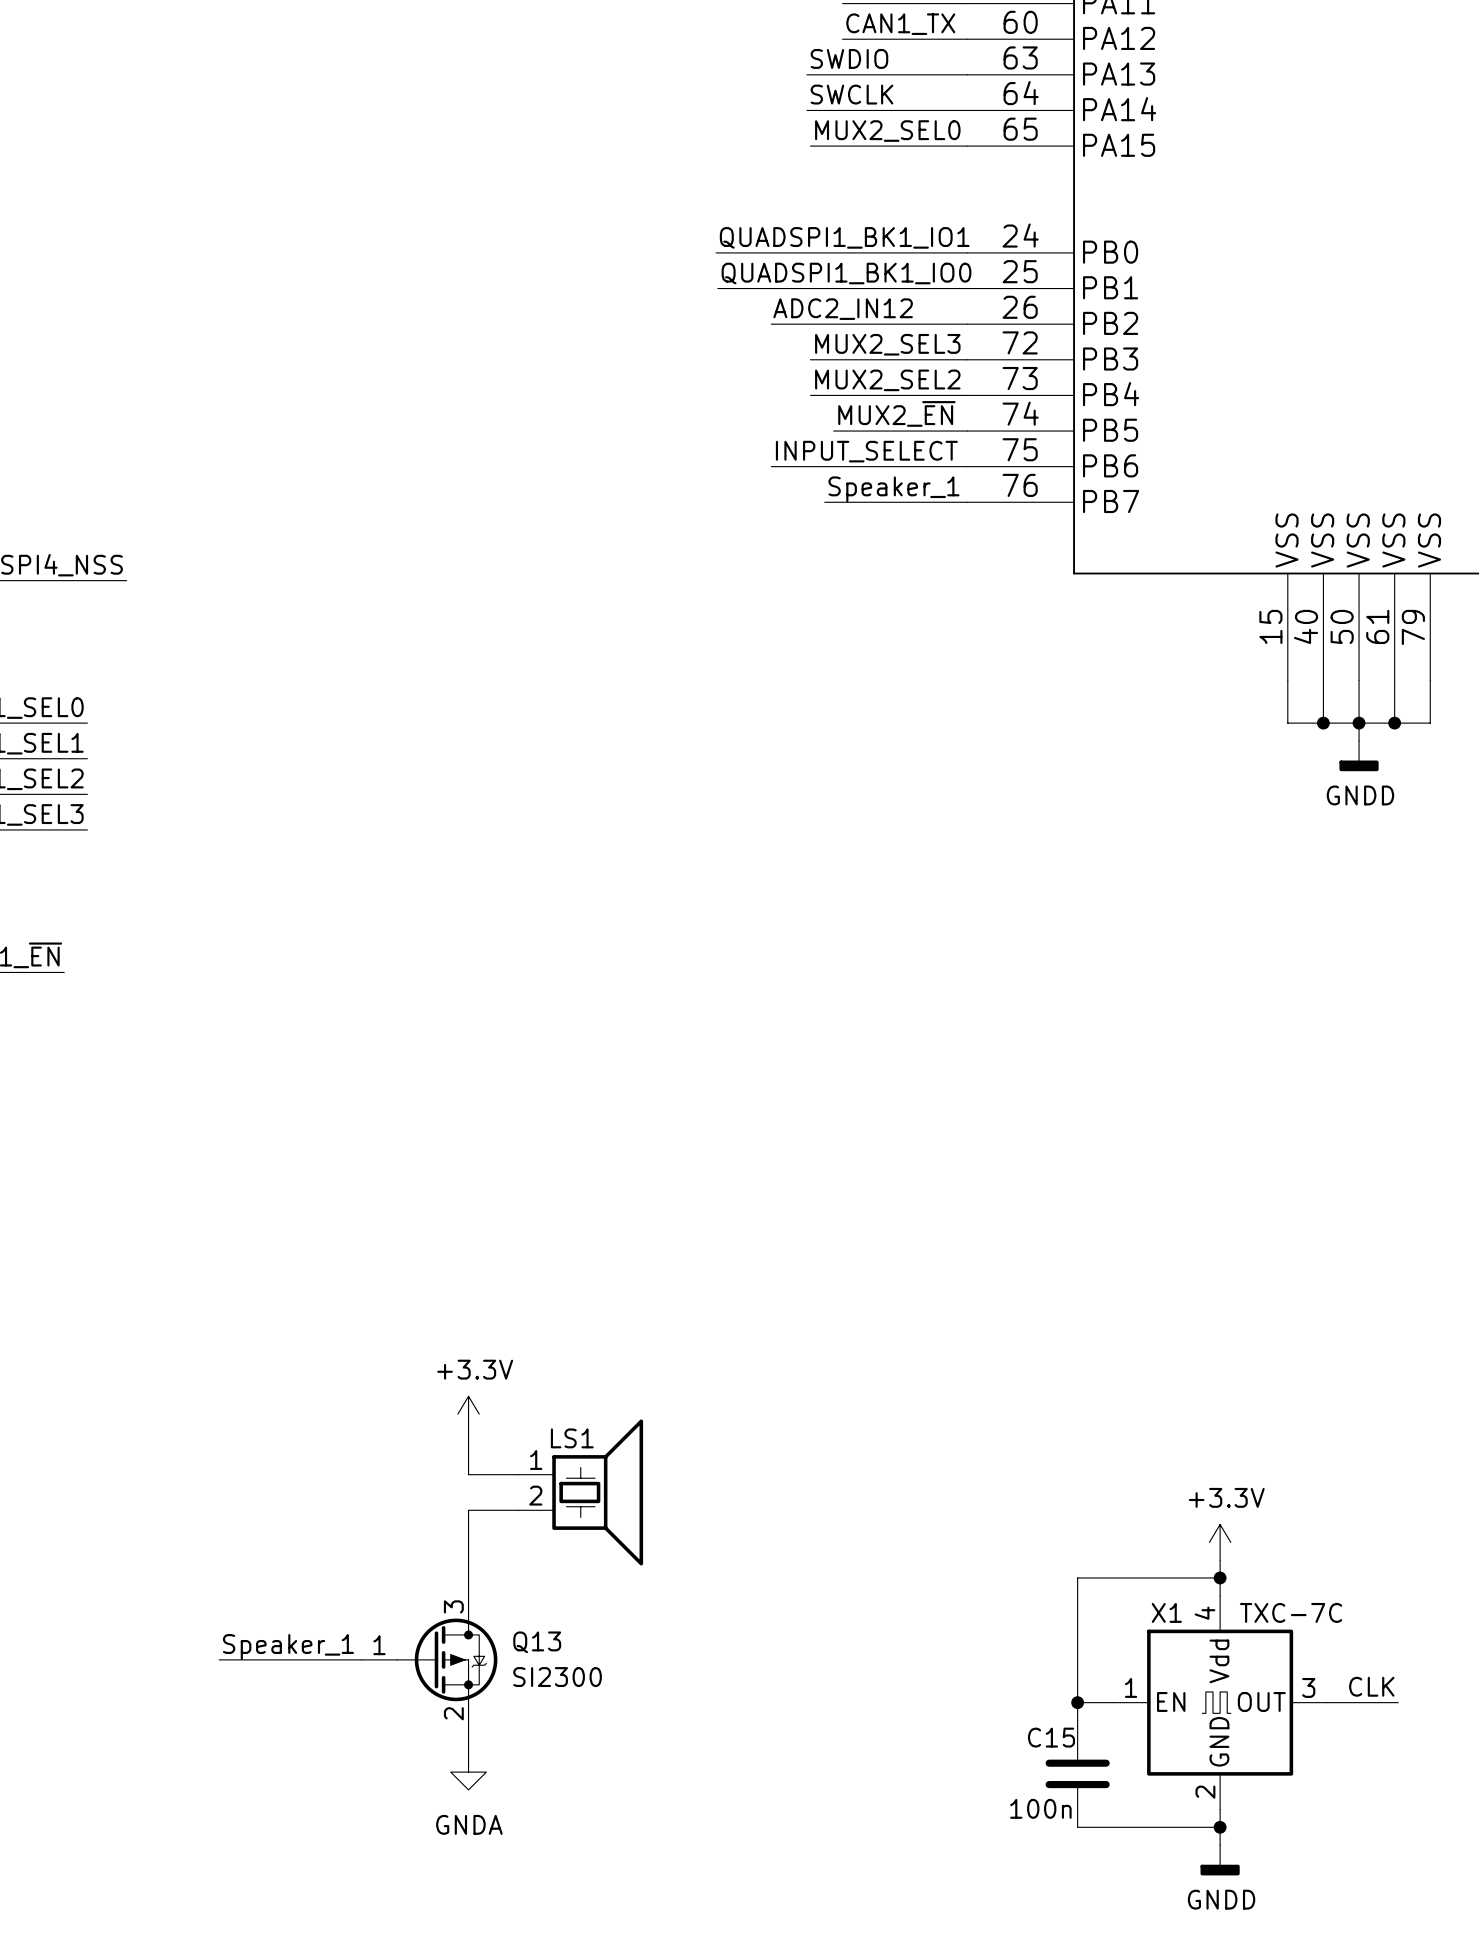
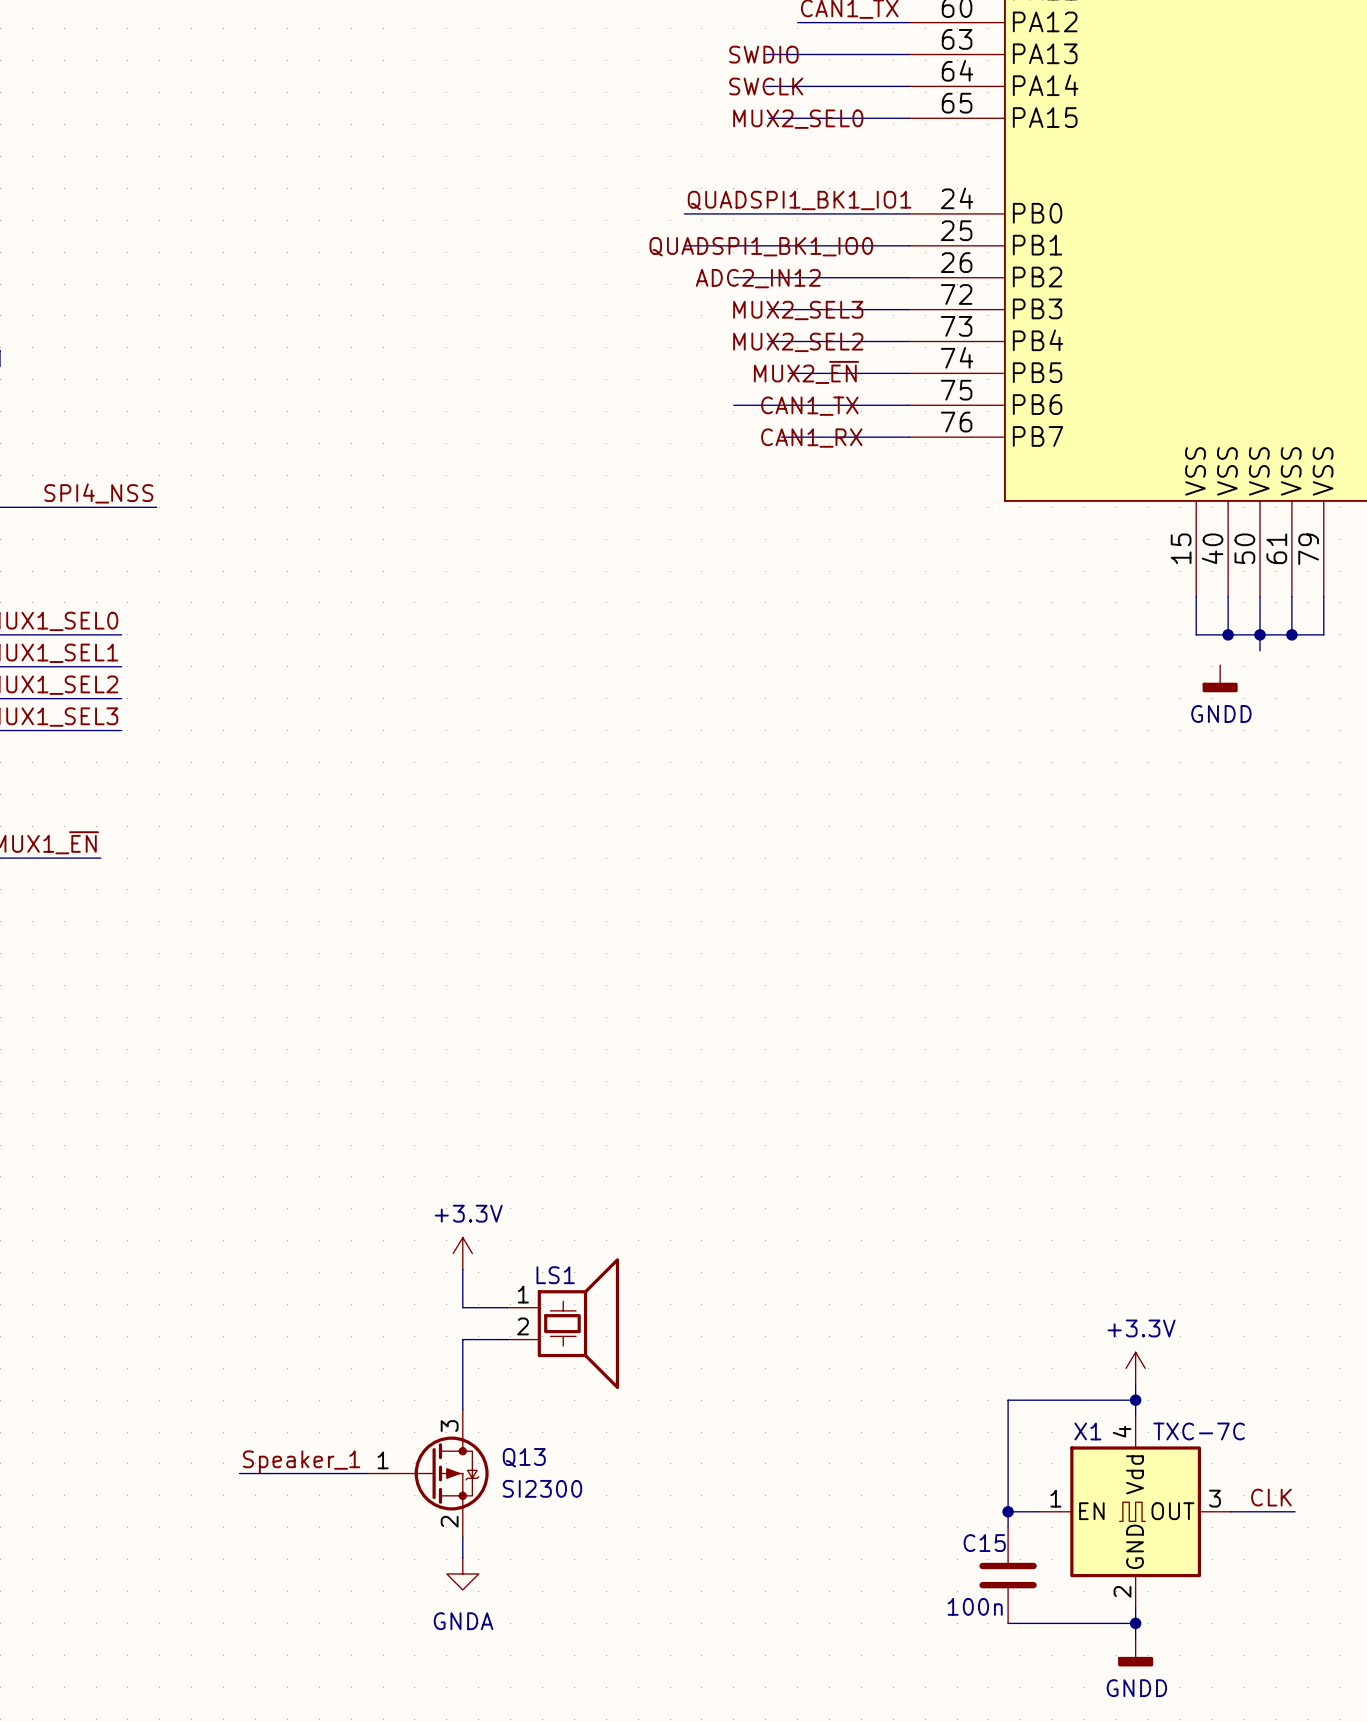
label position: SWDIO (849, 58) -> SWDIO (763, 54)
label position: SWCLK (852, 94) -> SWCLK (766, 86)
label position: MUX2_SEL0 (887, 131) -> MUX2_SEL0 (798, 119)
label position: QUADSPI1_BK1_IO0 (846, 273) -> QUADSPI1_BK1_IO0 (761, 246)
label position: ADC2_IN12 (843, 309) -> ADC2_IN12 (758, 278)
label position: MUX2_SEL3 (887, 344) -> MUX2_SEL3 (798, 310)
label position: MUX2_SEL2 (887, 380) -> MUX2_SEL2 (798, 342)
label position: MUX2_~{EN} (896, 413) -> MUX2_~{EN} (806, 372)
label: INPUT_SELECT (866, 451) -> none
label: none -> CAN1_TX (809, 406)
label: Speaker_1 (893, 489) -> none
label: none -> CAN1_RX (811, 438)
power symbol position: GNDD (1359, 756) -> GNDD (1220, 678)

